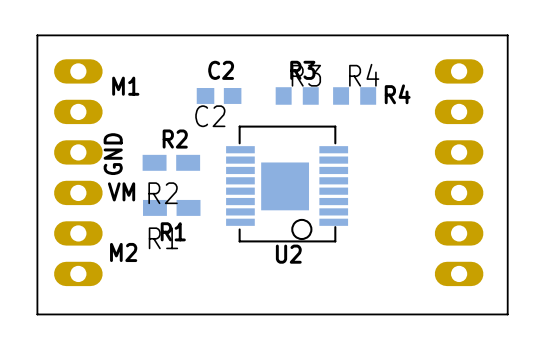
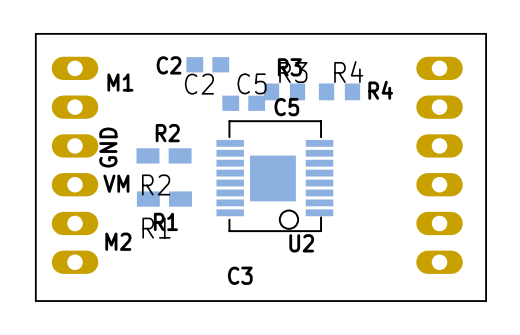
text position: C2 (221, 70) -> C2 (169, 65)
C2 position: (219, 95) -> (207, 64)
C5: none -> (243, 103)
text: none -> C5 (286, 107)
text position: U2 (288, 254) -> U2 (301, 243)
text: none -> C3 (240, 275)

